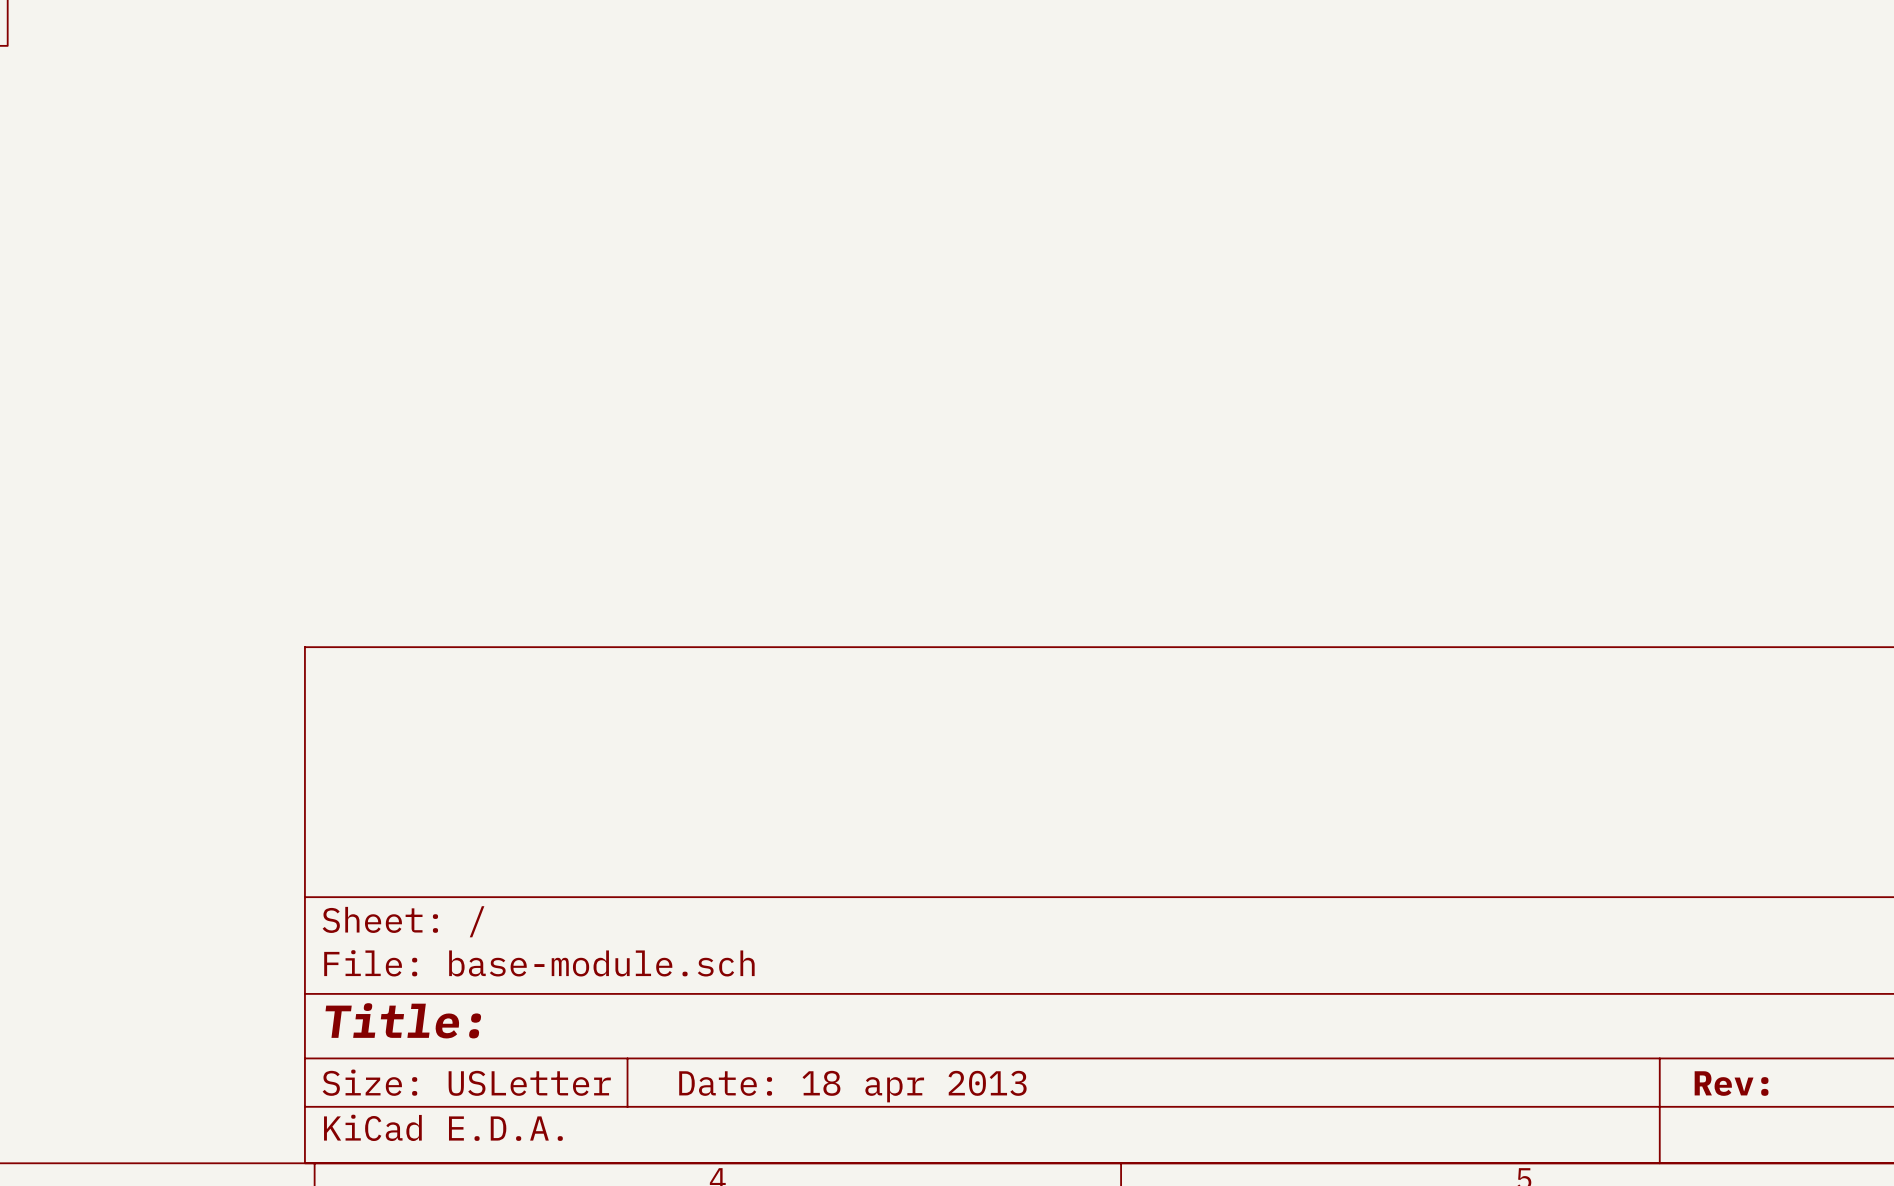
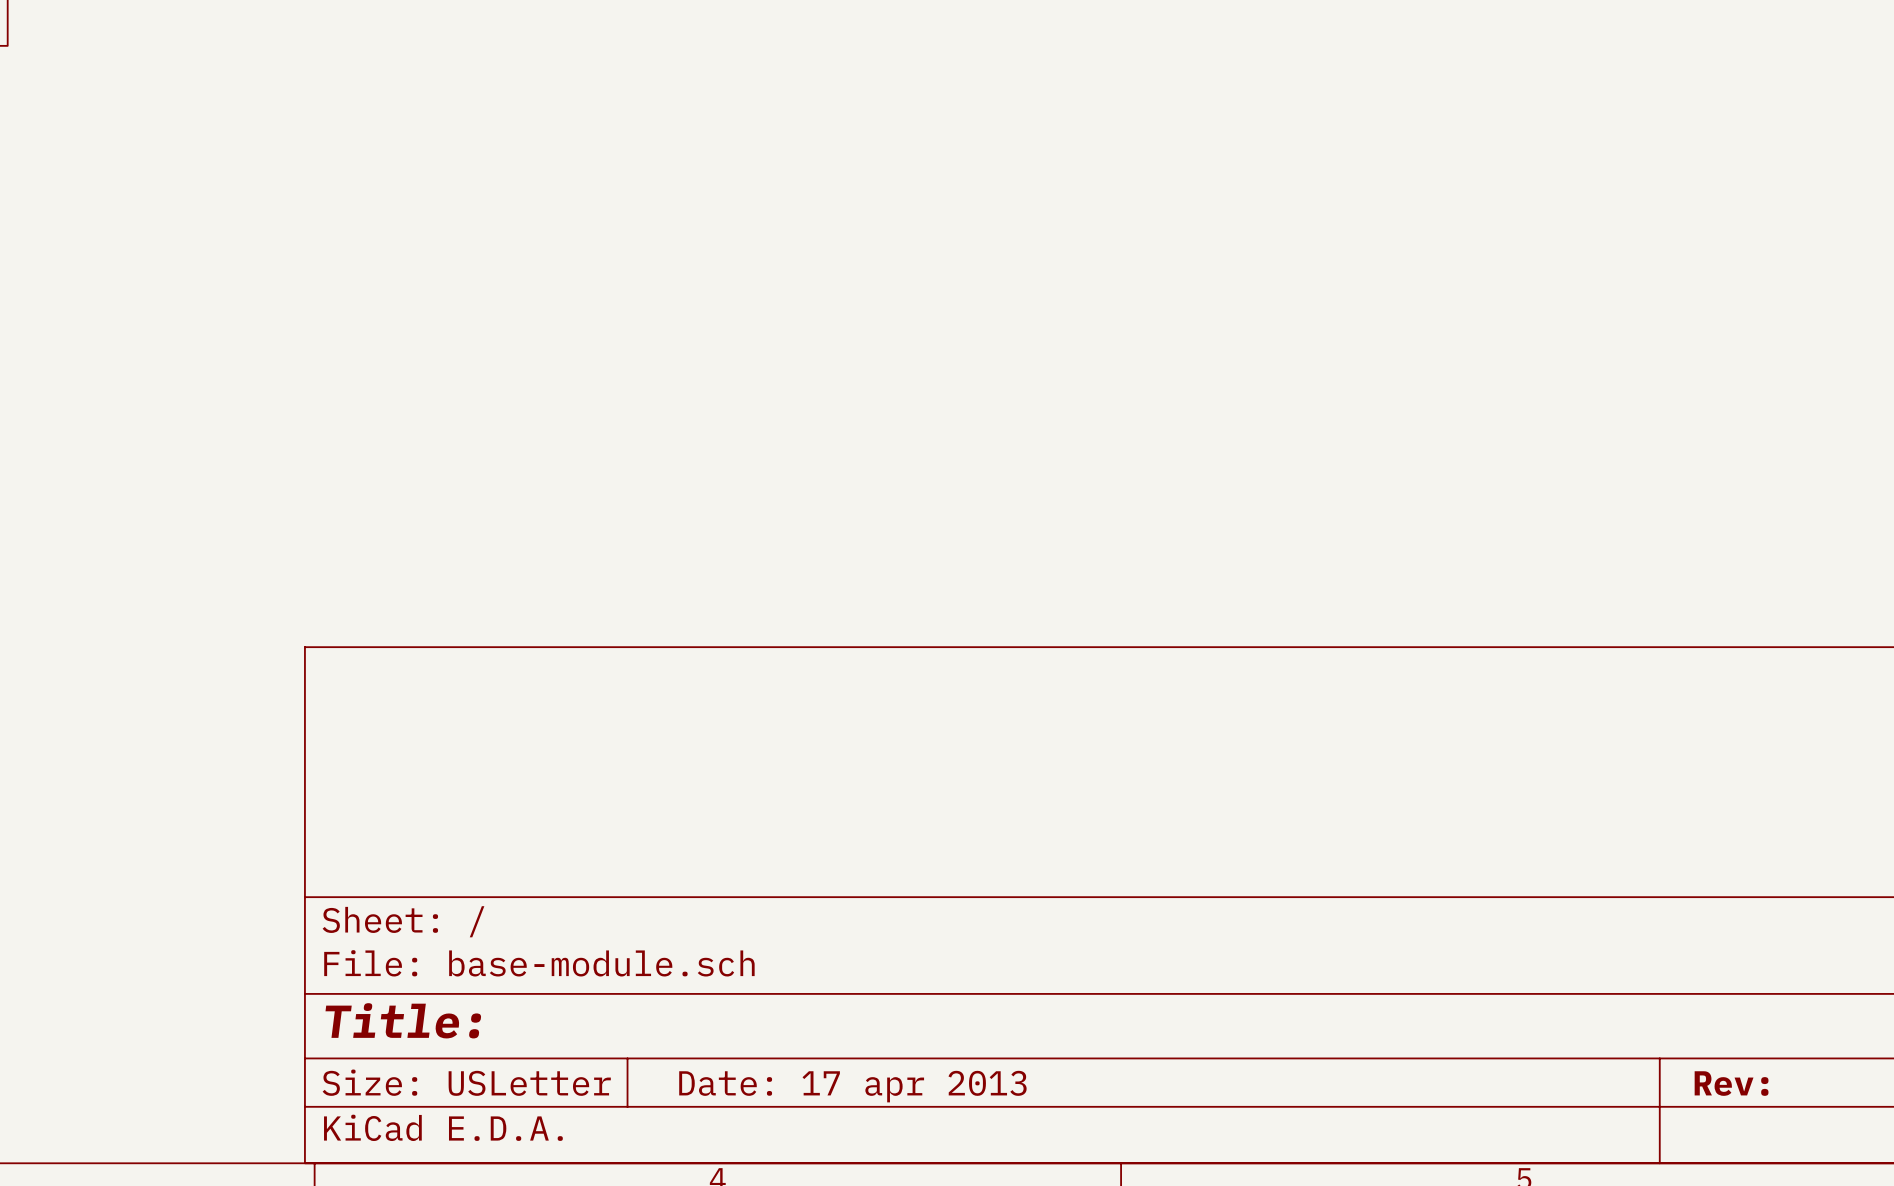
title block: Date: 18 apr 2013 (852, 1086) -> Date: 17 apr 2013 (852, 1086)

